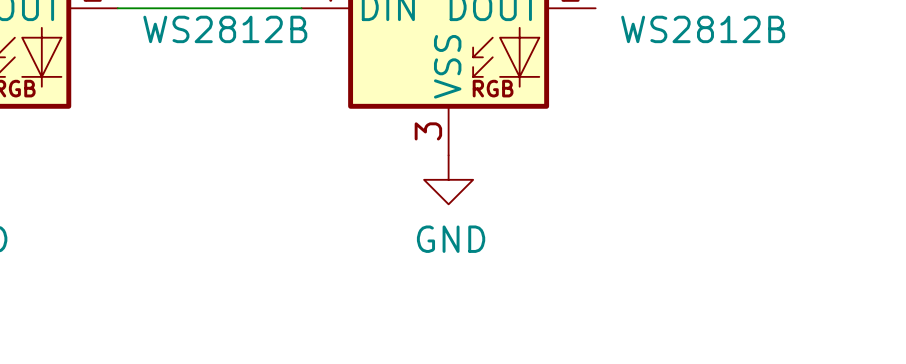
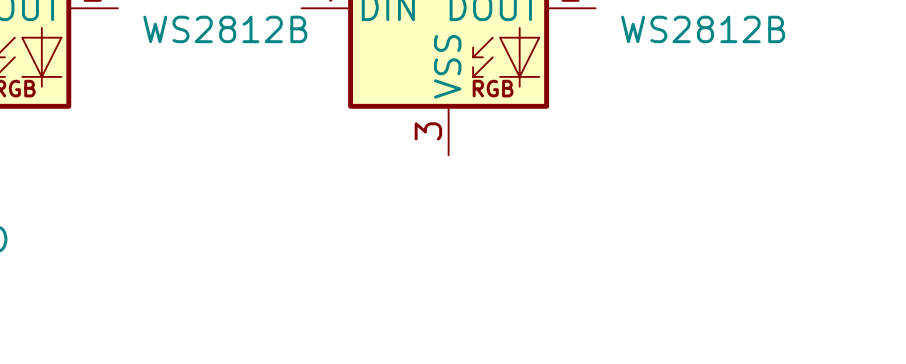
wire: (117, 8) (301, 8) -> none
power symbol: GND (448, 179) -> none

